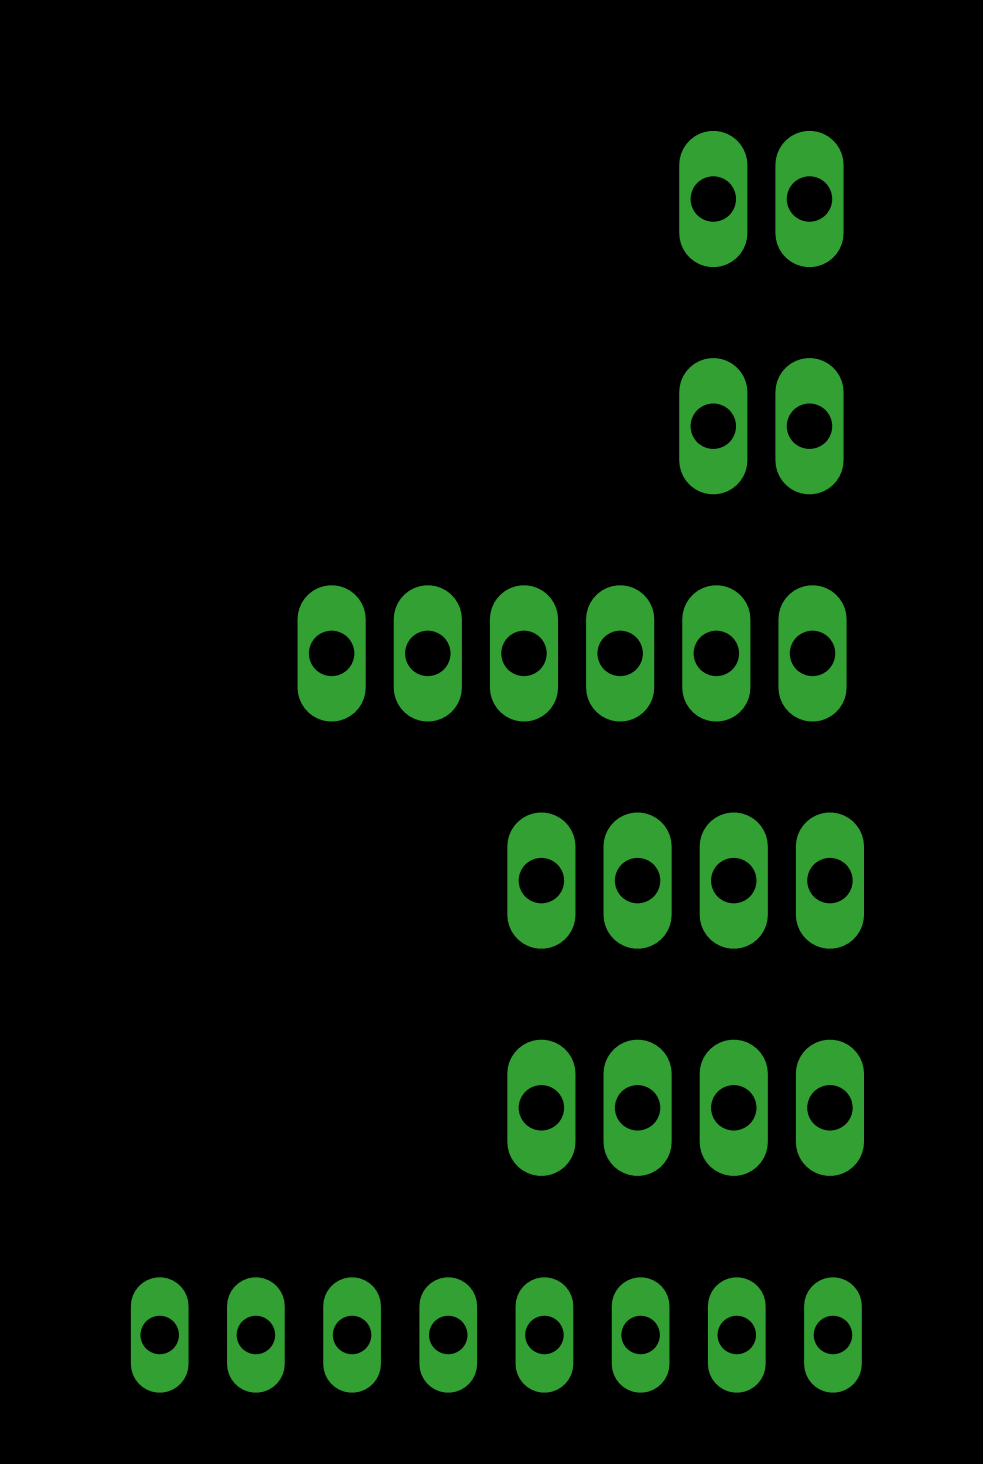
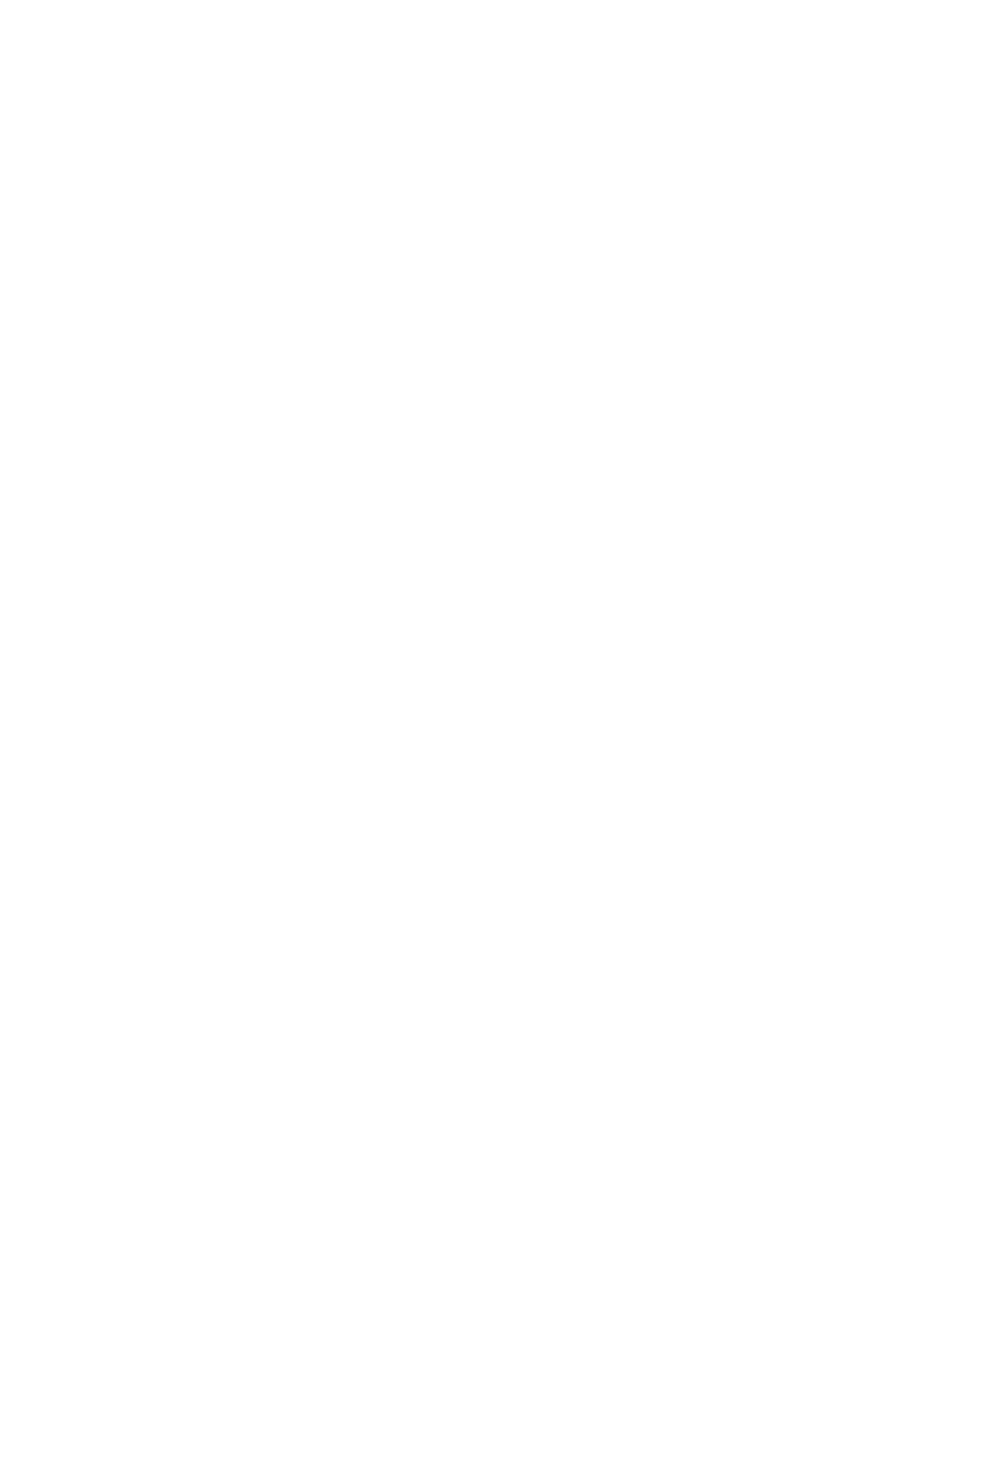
part: (761, 199) -> none
part: (761, 426) -> none
part: (572, 653) -> none
part: (685, 880) -> none
part: (685, 1107) -> none
part: (496, 1334) -> none

